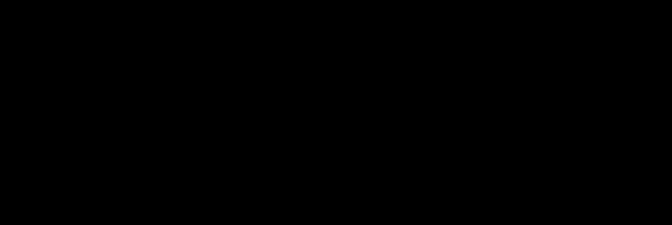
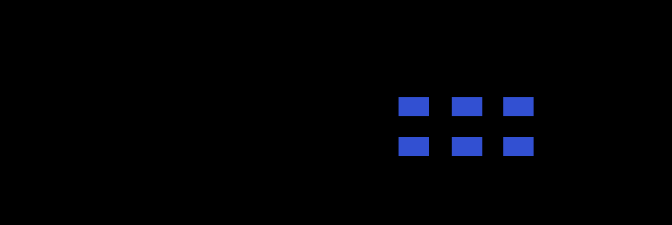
part: none -> (413, 126)
part: none -> (467, 126)
part: none -> (518, 126)

